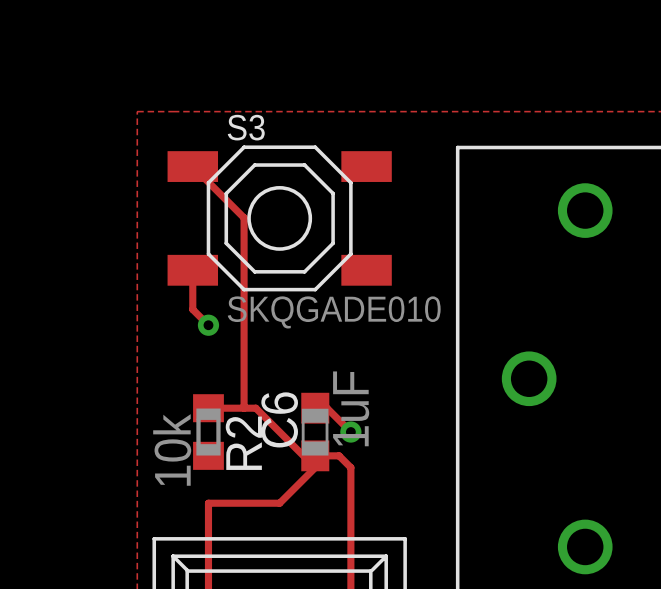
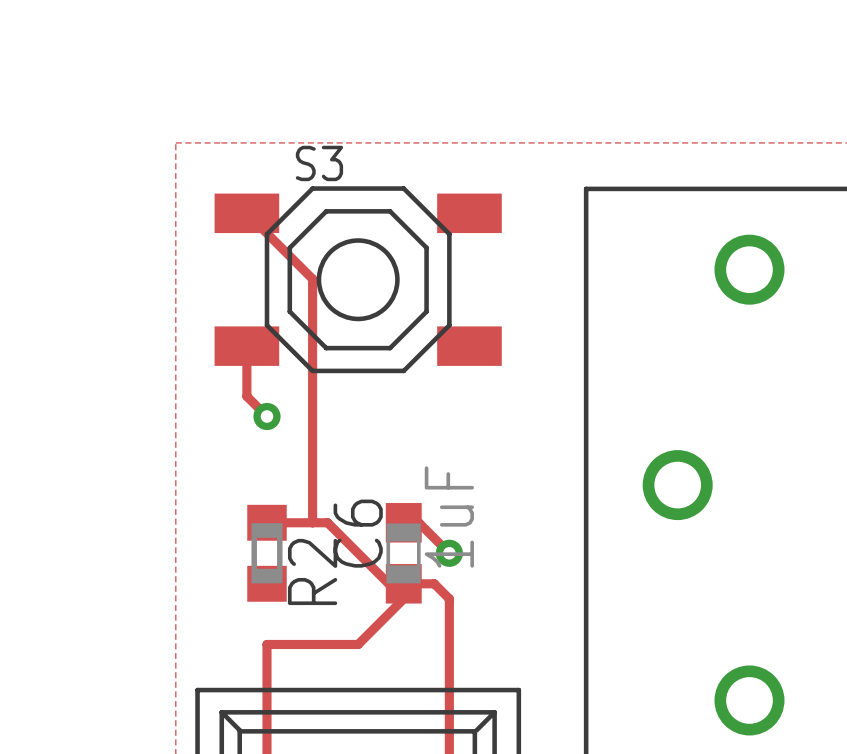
S3 value: SKQGADE010 (334, 312) -> none
R2 value: 10k (172, 449) -> none

